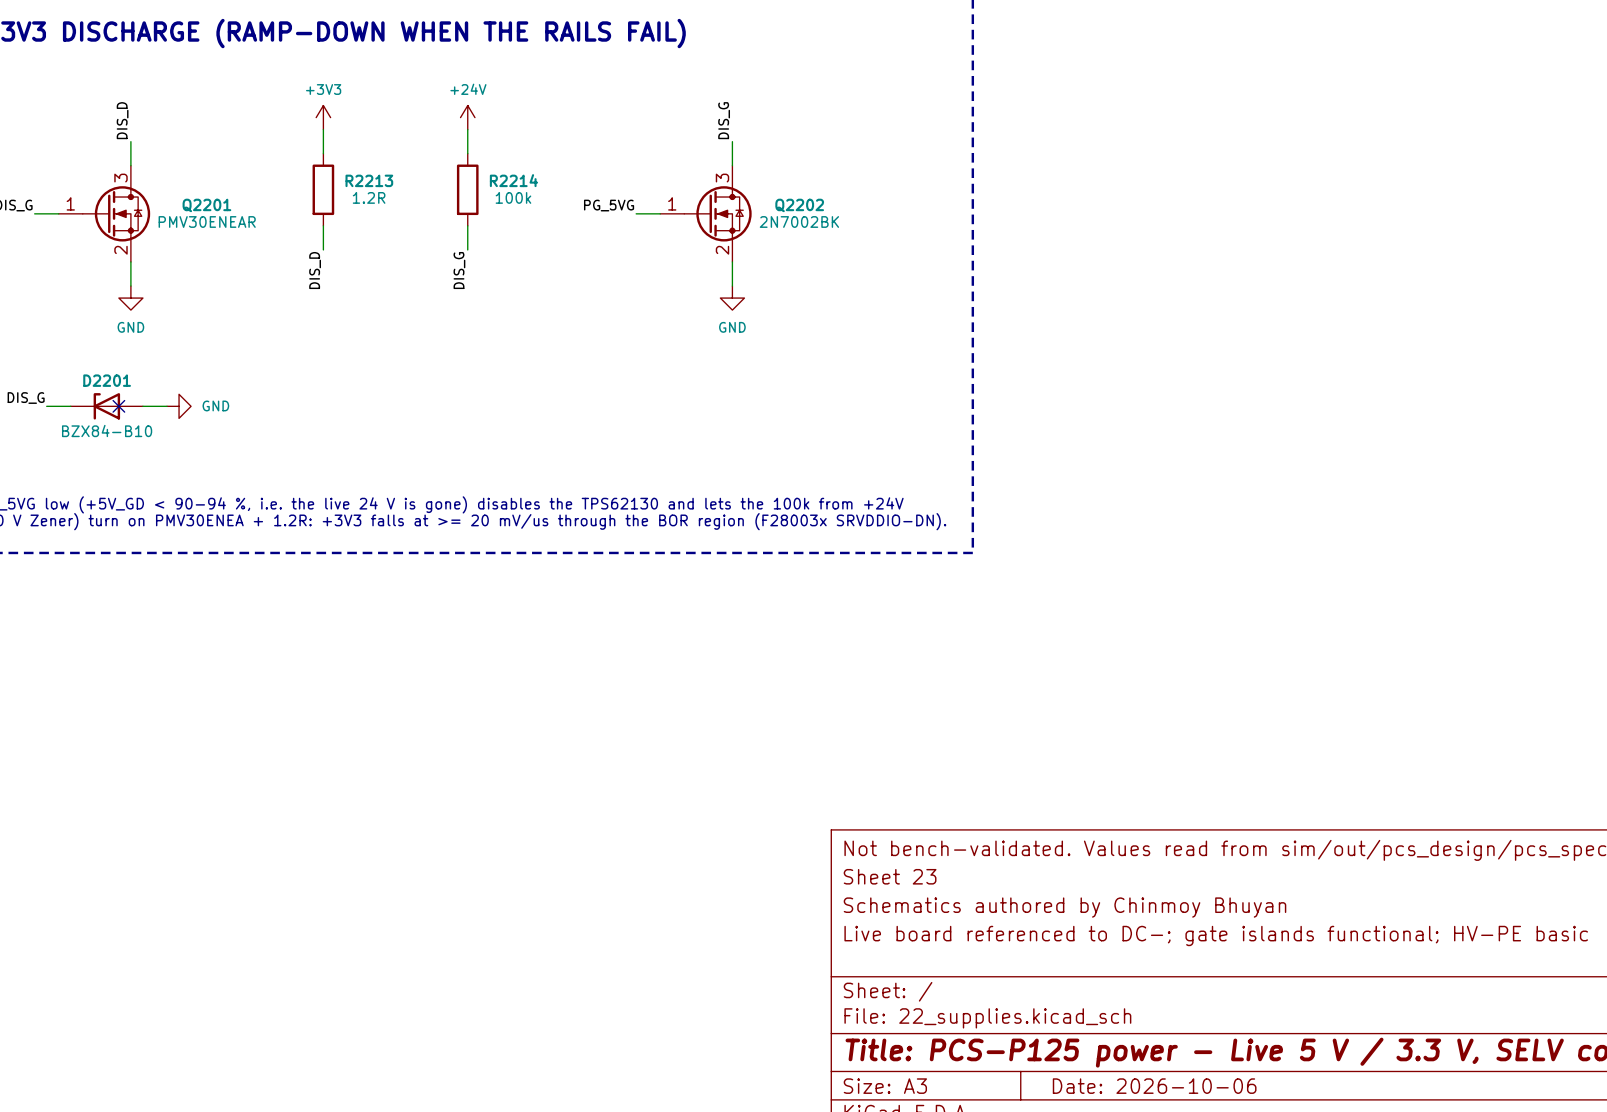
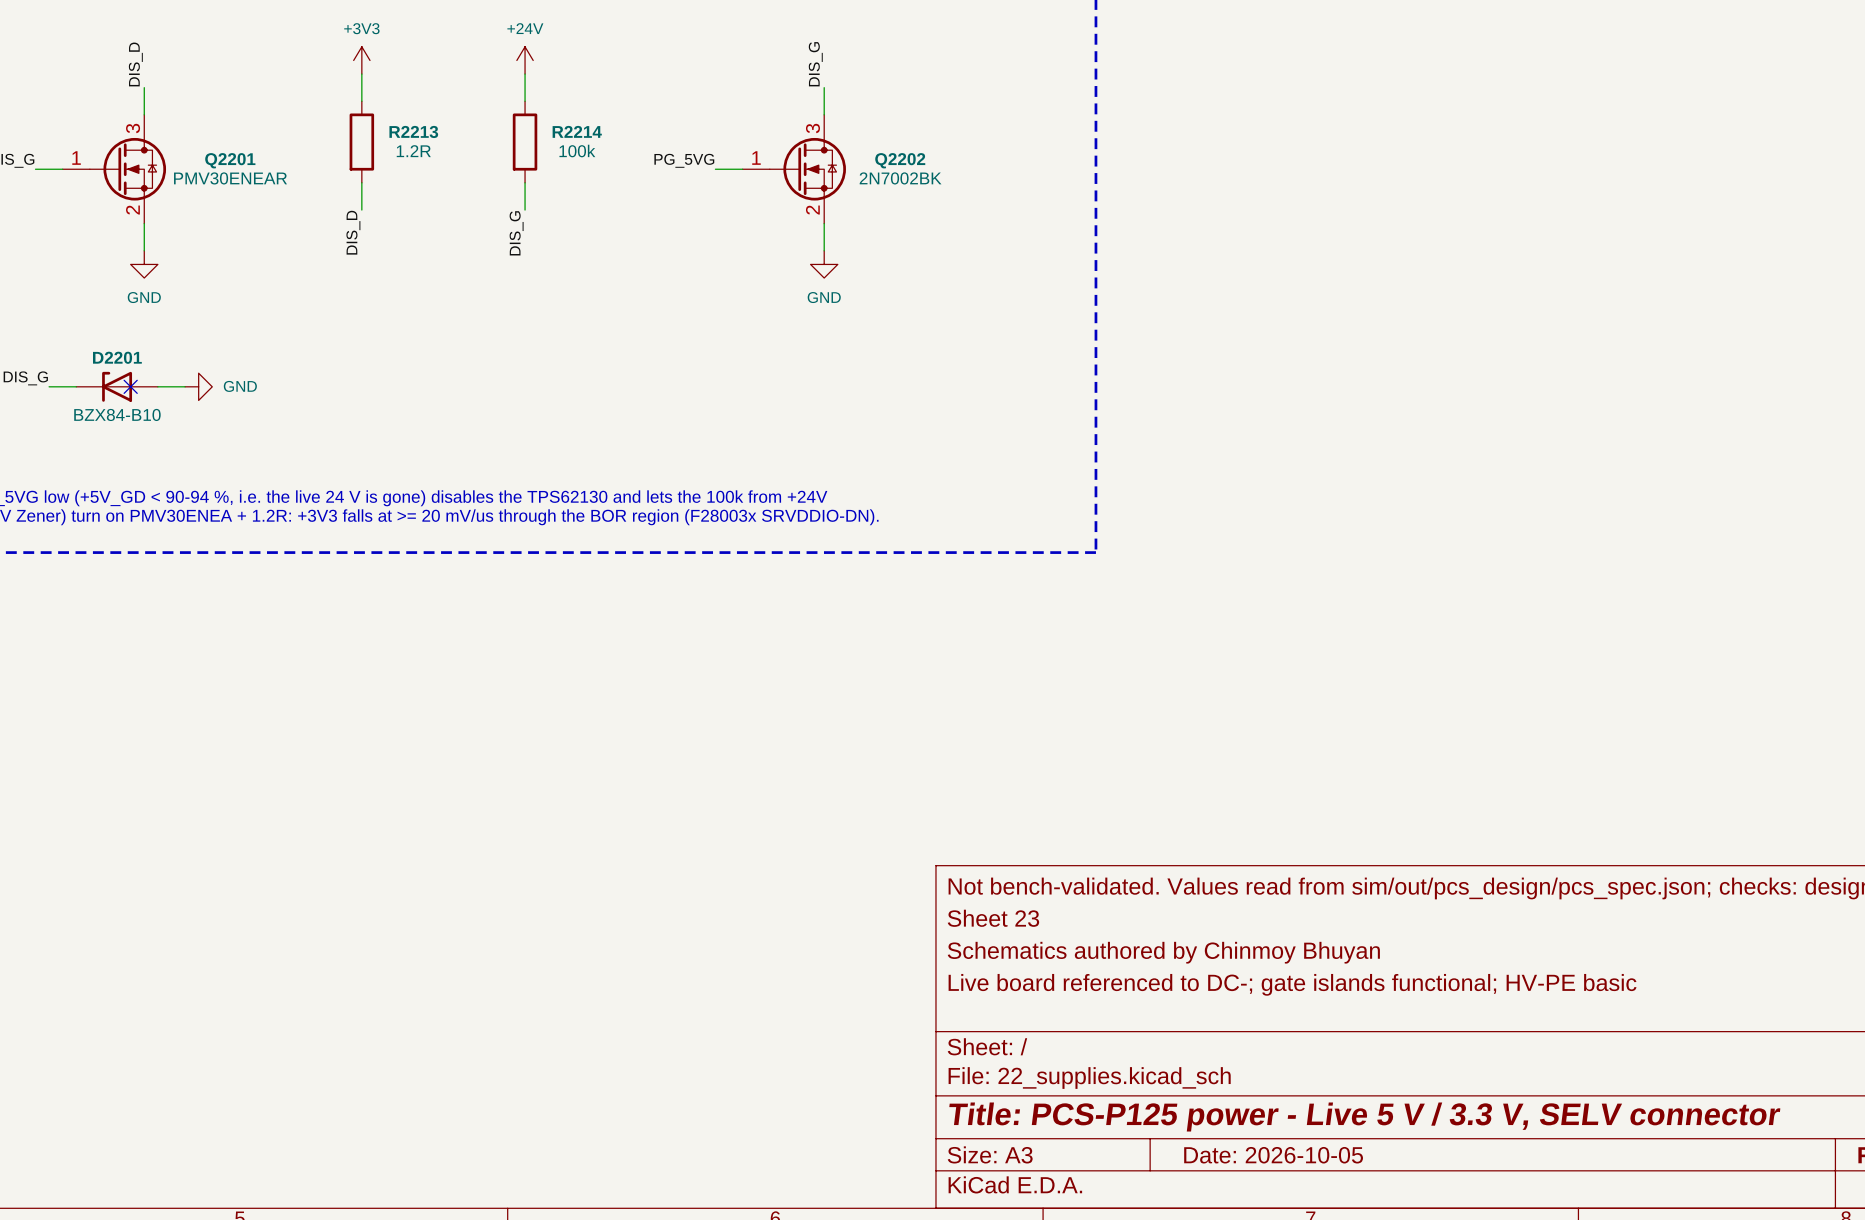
title block: Date: 2026-10-06 (1154, 1086) -> Date: 2026-10-05 (1273, 1155)

